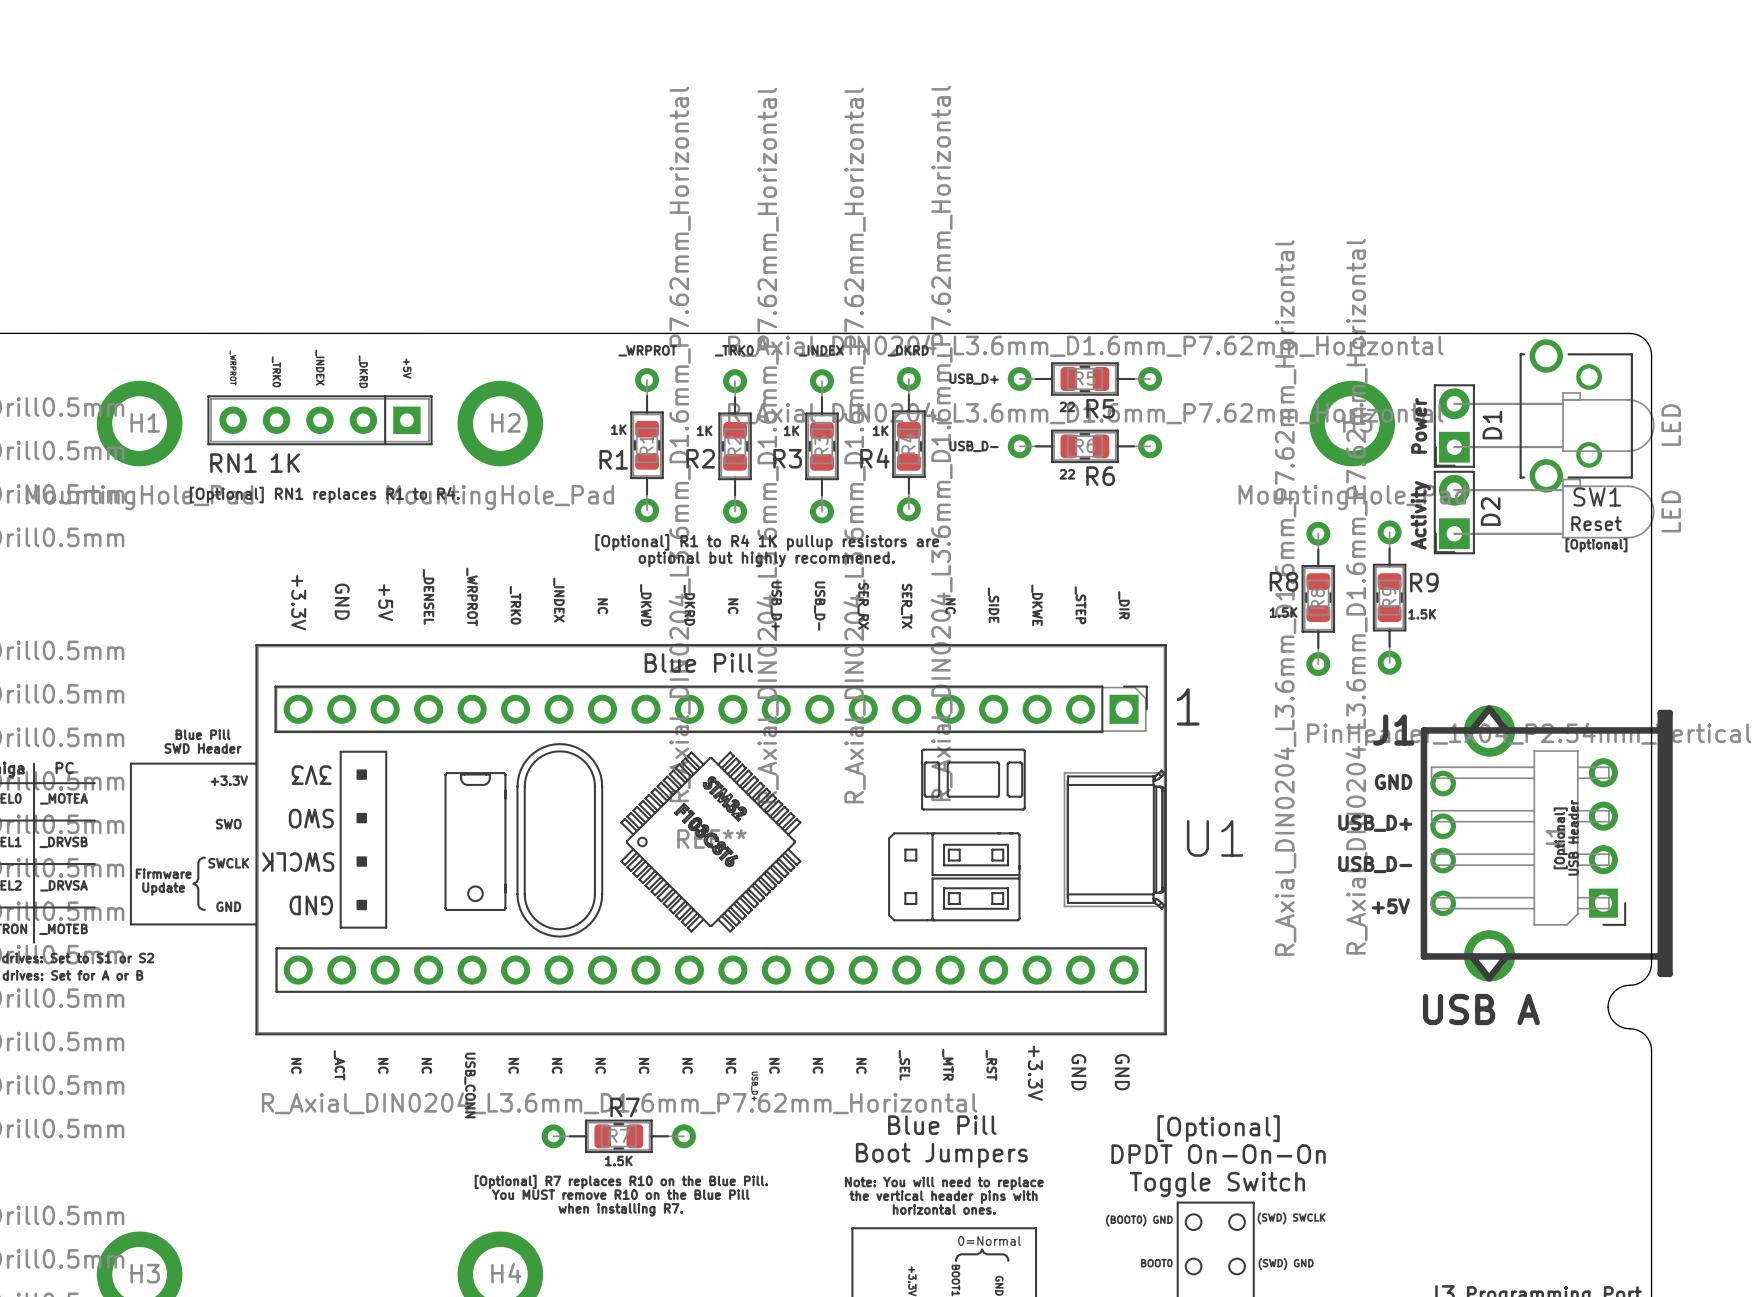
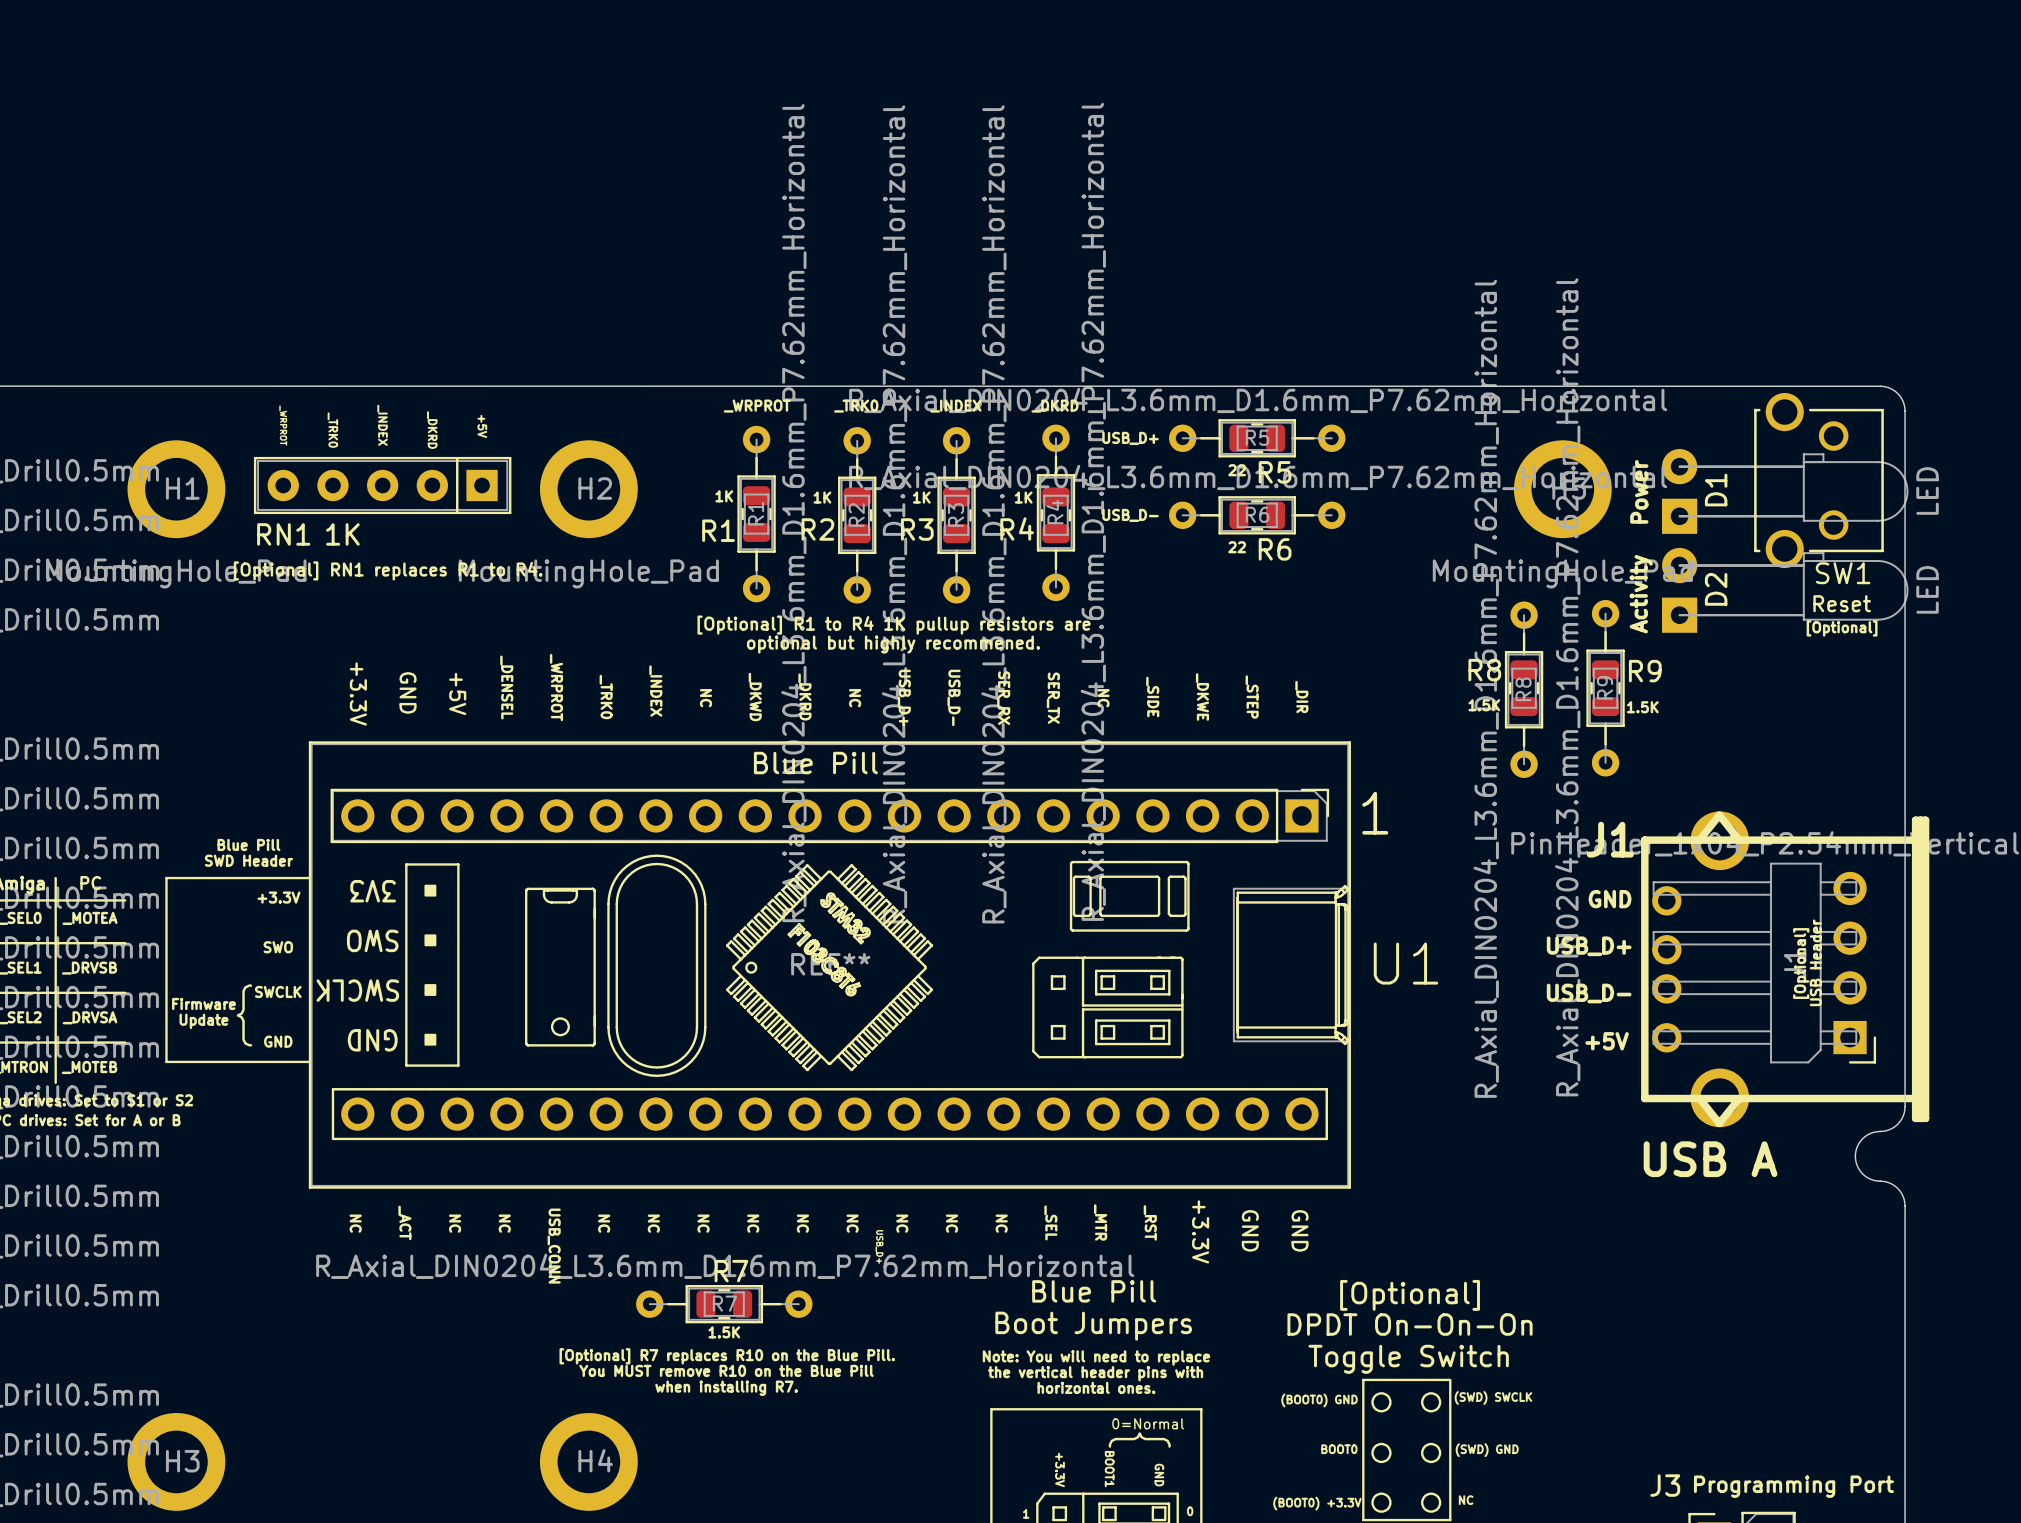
D1 footprint: [1433, 384, 1655, 468] -> [1661, 449, 1909, 534]
D2 footprint: [1433, 470, 1655, 555] -> [1661, 547, 1909, 633]

